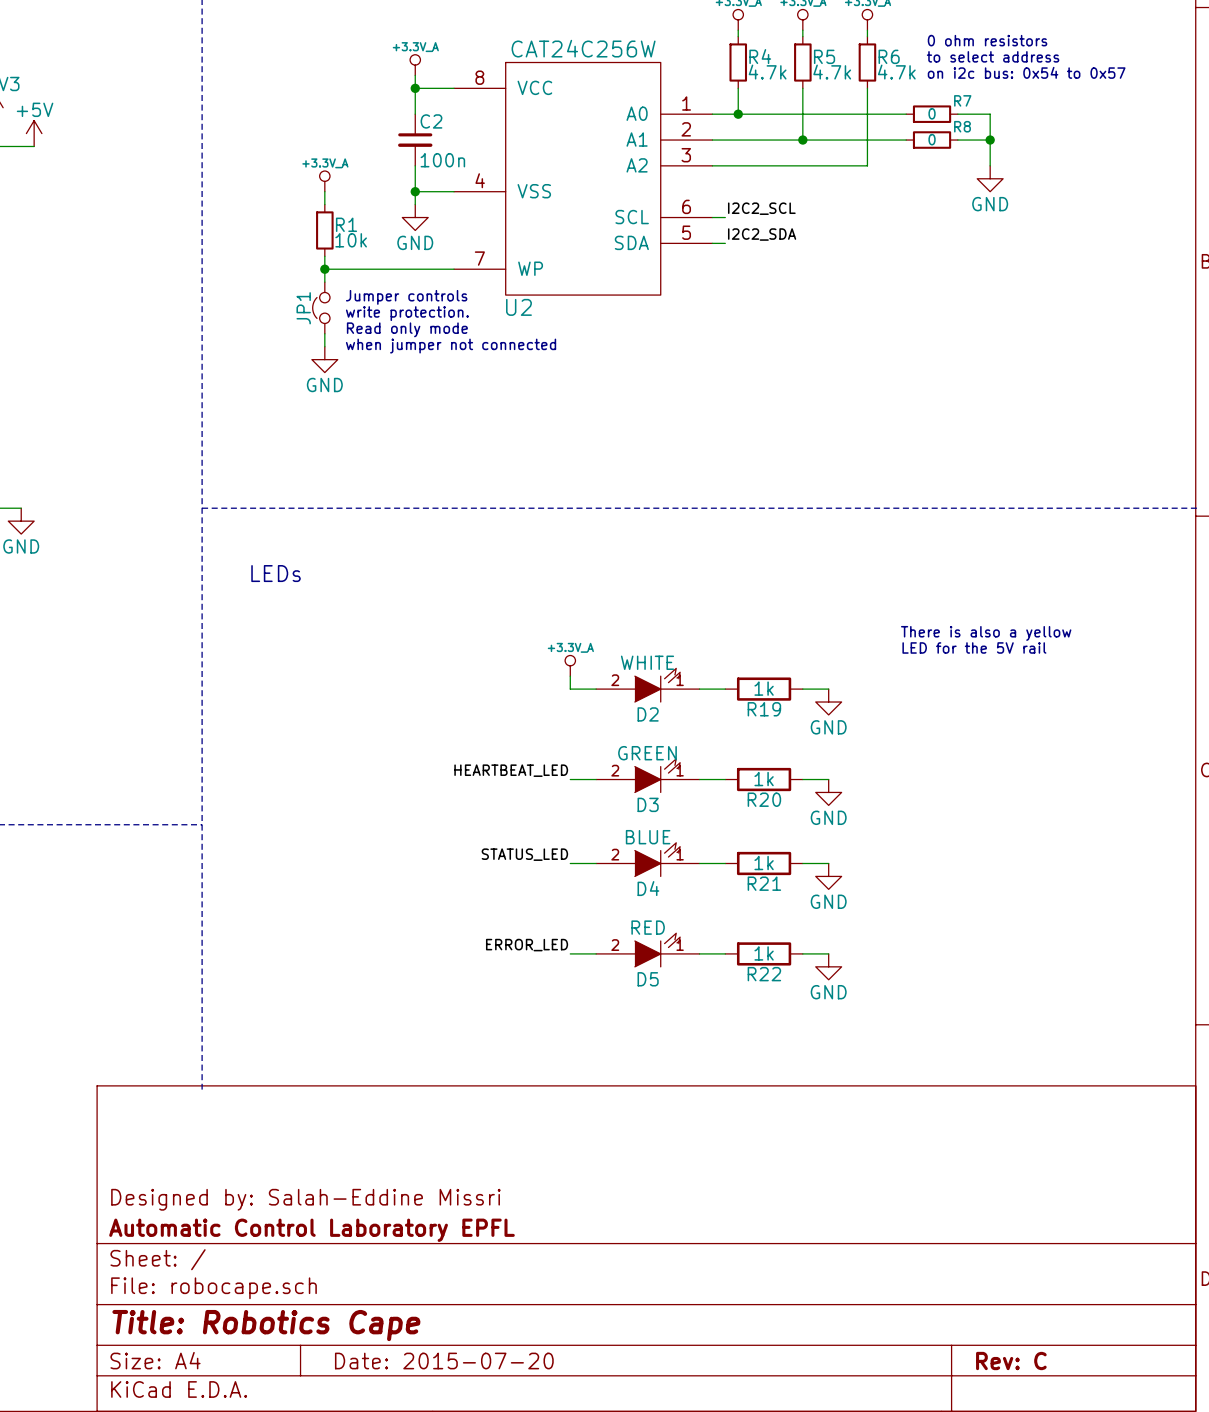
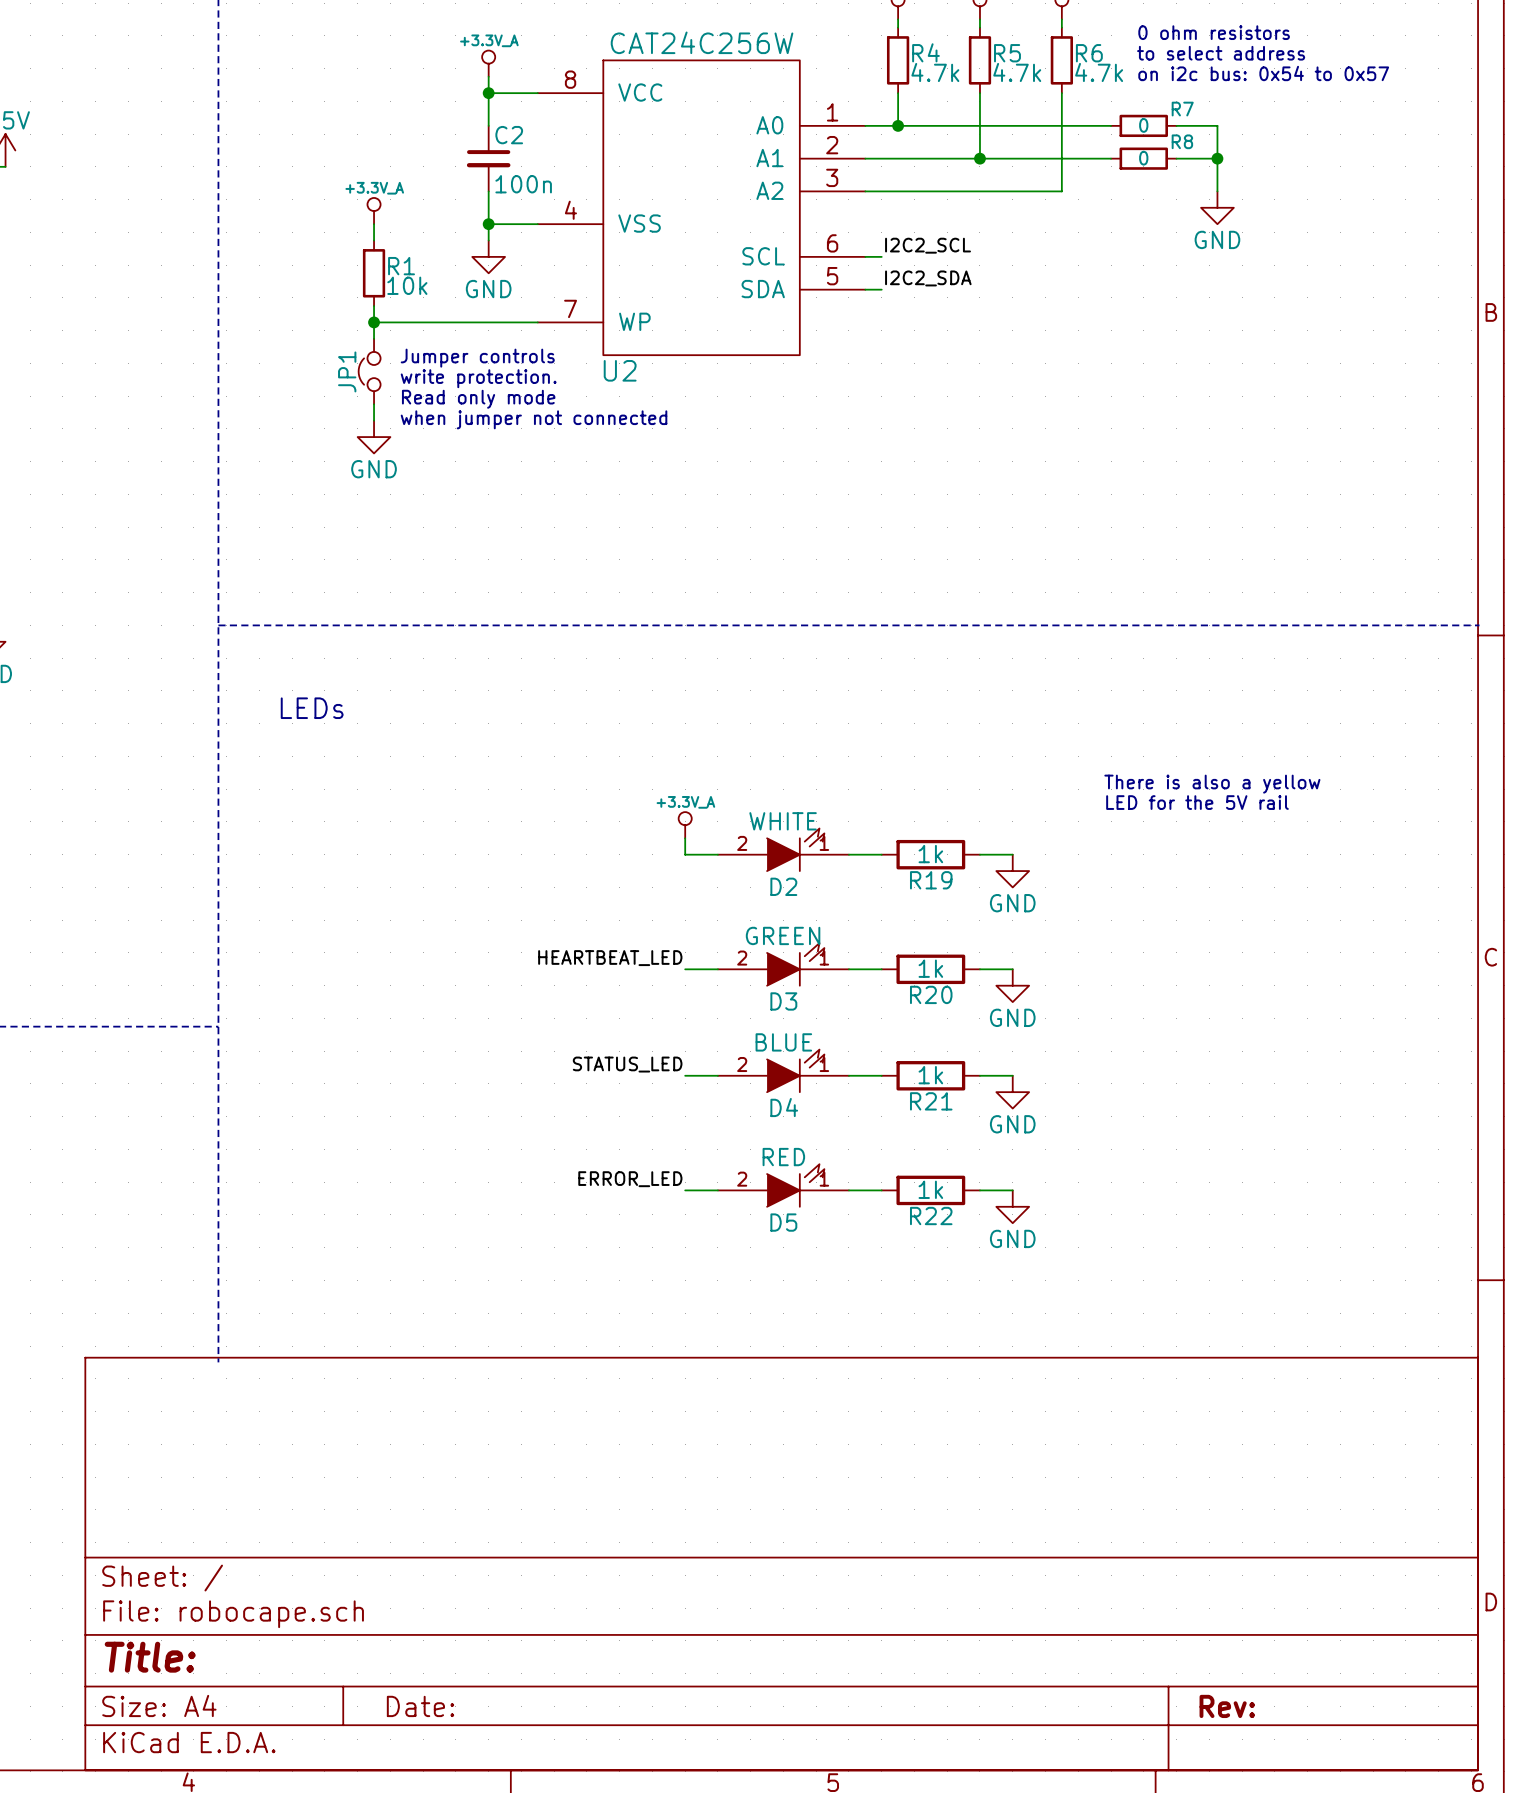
title block: Designed by: Salah-Eddine Missri (305, 1199) -> none
title block: Automatic Control Laboratory EPFL (311, 1230) -> none
title block: Title: Robotics Cape (266, 1325) -> Title: (150, 1657)
title block: Date: 2015-07-20 (444, 1361) -> Date: (420, 1706)
title block: Rev: C (1011, 1361) -> Rev: (1227, 1706)

